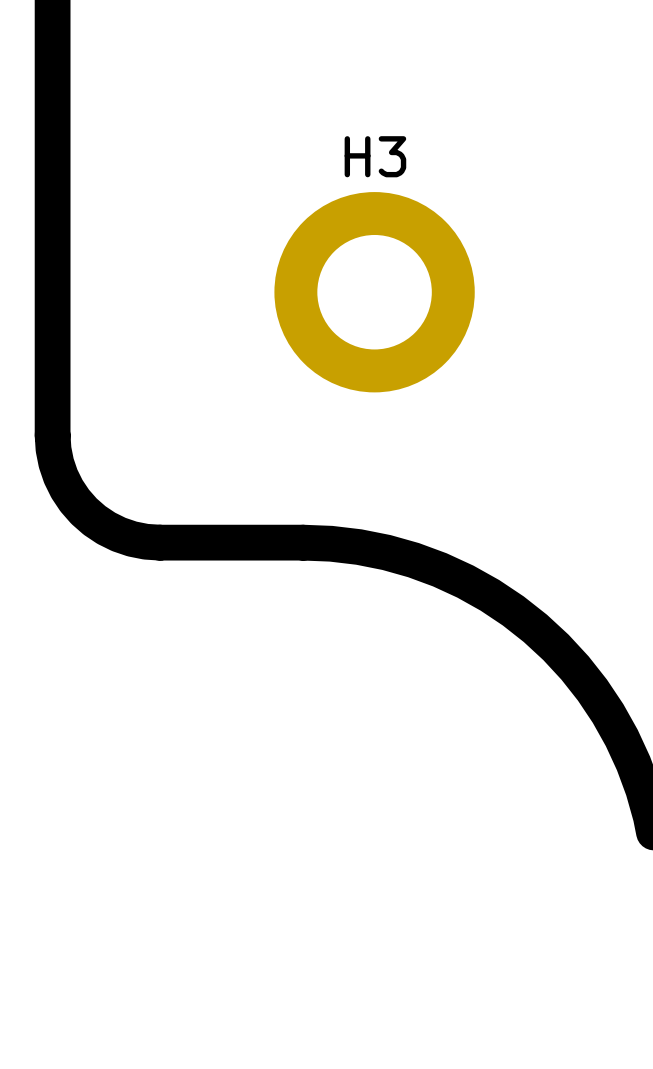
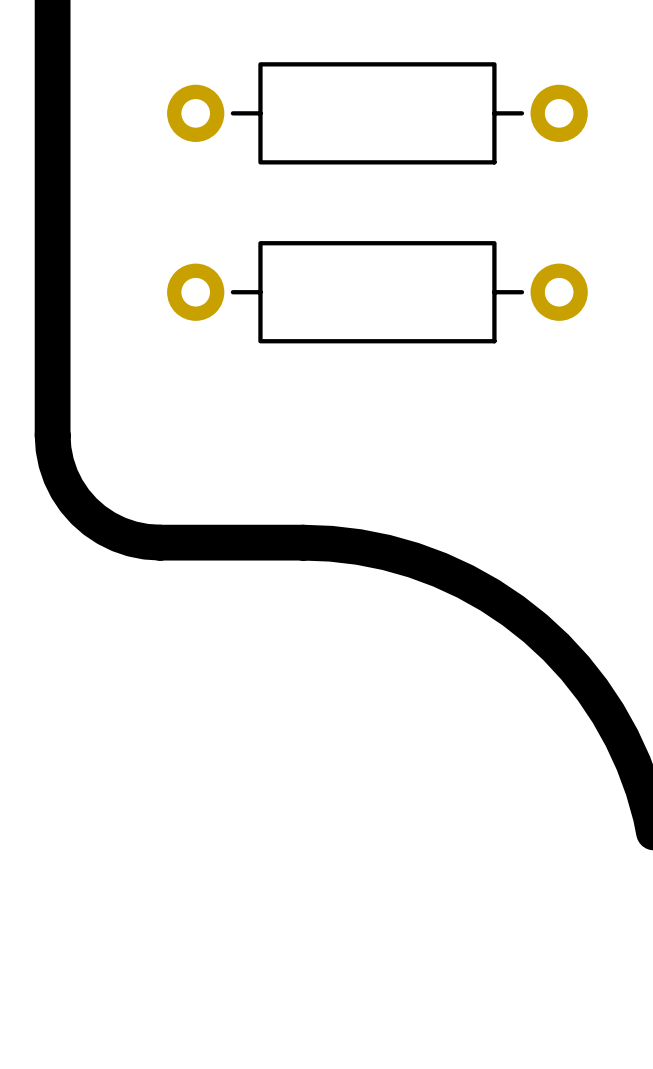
part: none -> (377, 113)
H3: (374, 292) -> none
part: none -> (377, 292)

